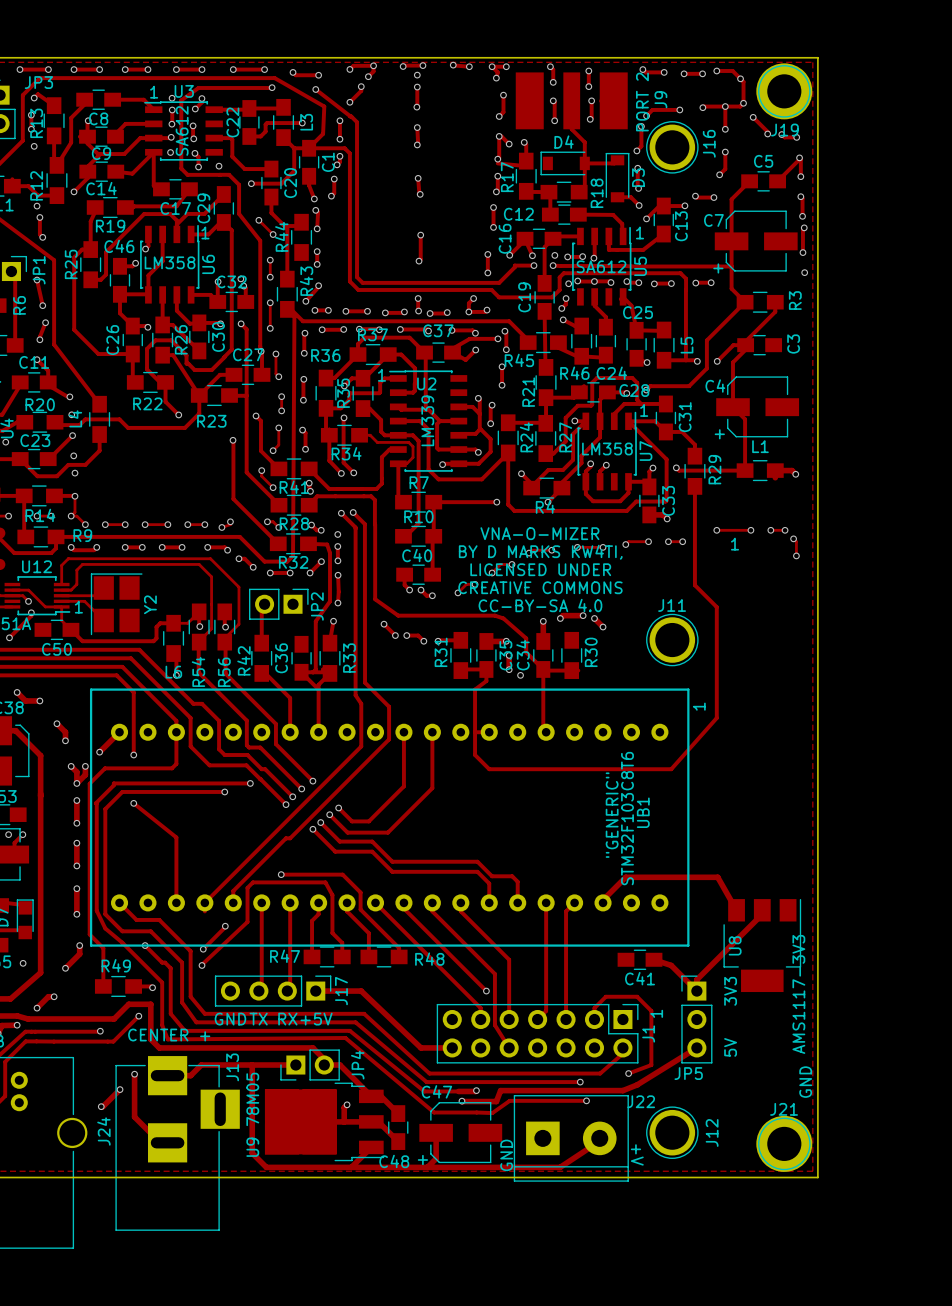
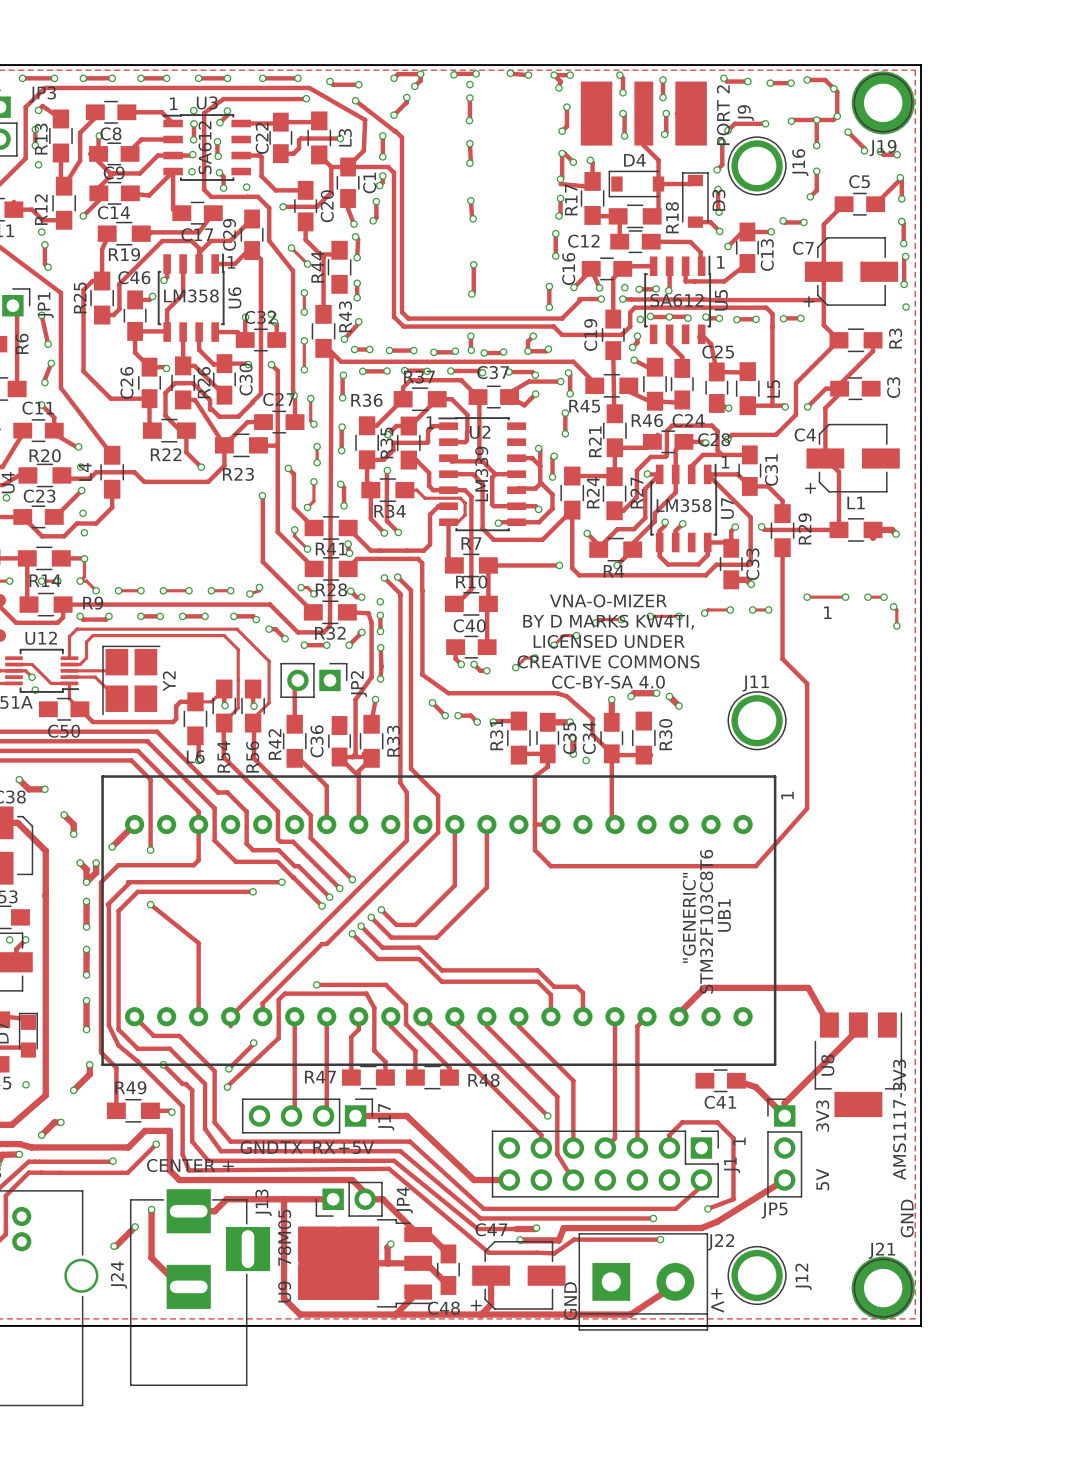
text: 1 (78, 607) -> none
track: (31, 612) (31, 615) (9, 637) -> none
via: (9, 637) -> none

